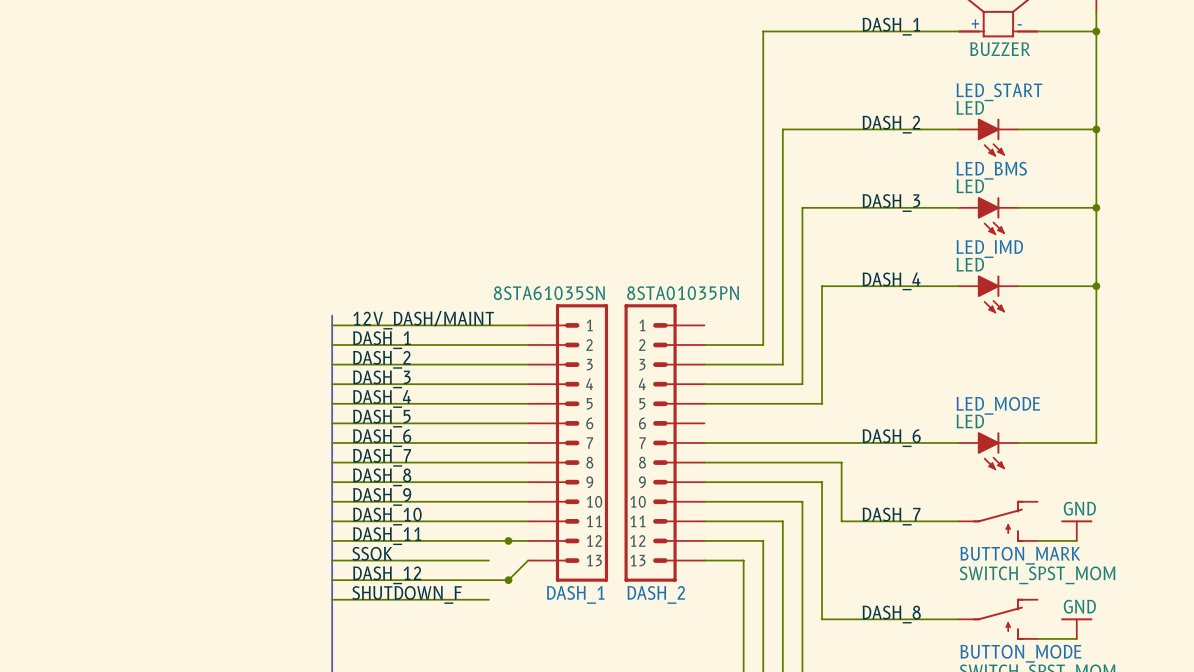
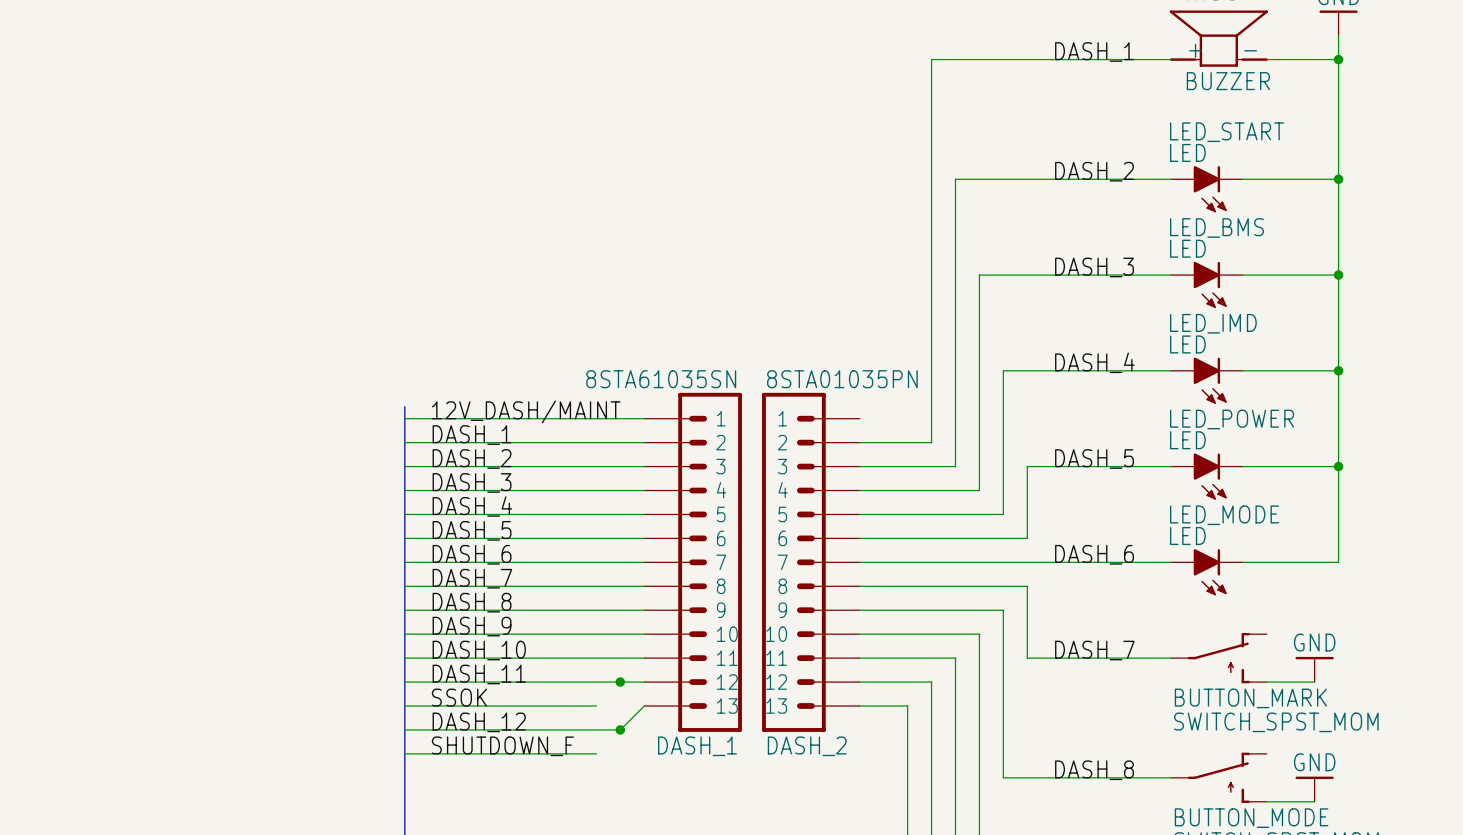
label: none -> DASH_5 (1094, 459)
wire: none -> (1170, 466) (1027, 466) (1027, 538) (859, 538)
wire: none -> (1242, 466) (1338, 466)
junction: none -> (1338, 466)
LED_POWER: none -> LED (1206, 476)

